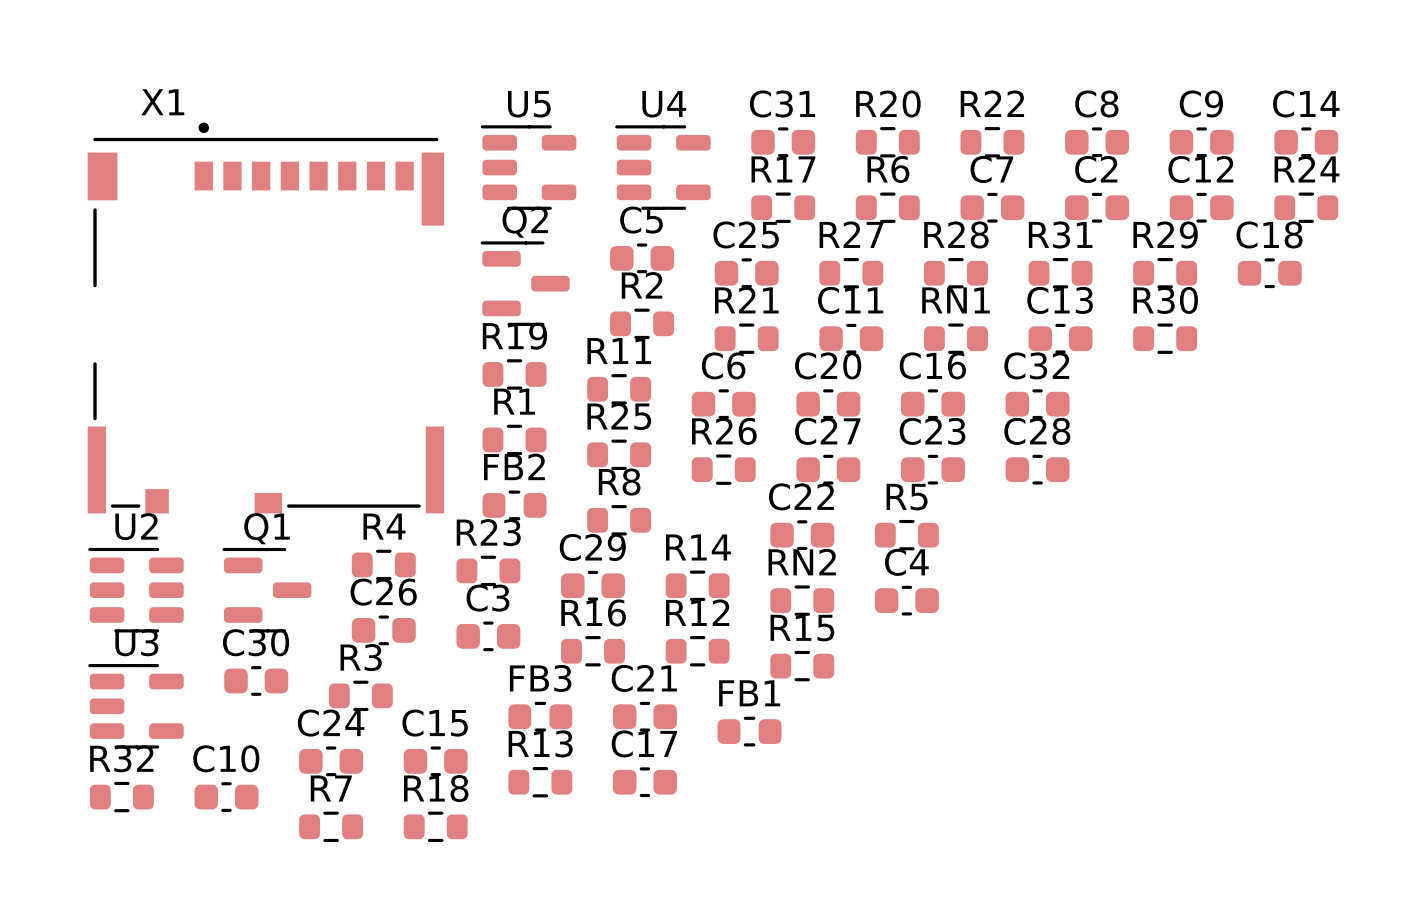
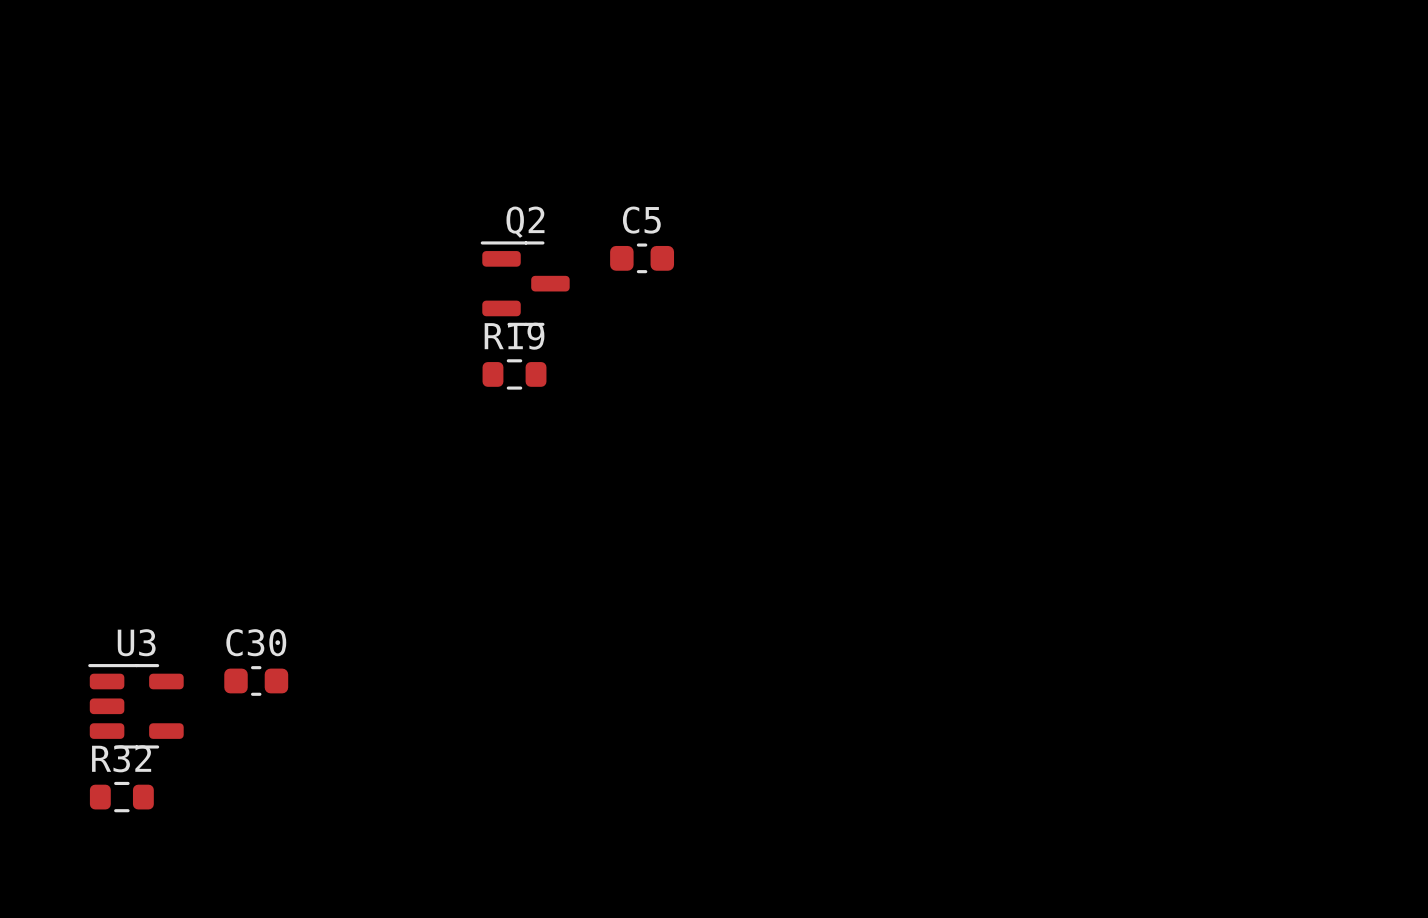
C31: (783, 142) -> none
R20: (887, 142) -> none
R22: (992, 142) -> none
C8: (1097, 142) -> none
C9: (1201, 142) -> none
C14: (1306, 142) -> none
U5: (528, 167) -> none
U4: (662, 167) -> none
R17: (783, 207) -> none
R6: (887, 207) -> none
C7: (992, 207) -> none
C2: (1097, 207) -> none
C12: (1201, 207) -> none
R24: (1306, 207) -> none
C25: (746, 273) -> none
R27: (851, 273) -> none
R28: (955, 273) -> none
R31: (1060, 273) -> none
R29: (1165, 273) -> none
C18: (1269, 273) -> none
X1: (265, 317) -> none
R2: (642, 323) -> none
R21: (746, 338) -> none
C11: (851, 338) -> none
RN1: (955, 338) -> none
C13: (1060, 338) -> none
R30: (1165, 338) -> none
R11: (619, 389) -> none
C6: (723, 404) -> none
C20: (828, 404) -> none
C16: (932, 404) -> none
C32: (1037, 404) -> none
R1: (514, 439) -> none
R25: (619, 454) -> none
R26: (723, 469) -> none
C27: (828, 469) -> none
C23: (932, 469) -> none
C28: (1037, 469) -> none
FB2: (514, 505) -> none
R8: (619, 520) -> none
C22: (802, 535) -> none
R5: (906, 535) -> none
R4: (383, 564) -> none
R23: (488, 570) -> none
C29: (593, 585) -> none
R14: (697, 585) -> none
U2: (135, 590) -> none
Q1: (266, 590) -> none
RN2: (802, 600) -> none
C4: (906, 600) -> none
C26: (383, 630) -> none
C3: (488, 636) -> none
R16: (593, 651) -> none
R12: (697, 651) -> none
R15: (802, 666) -> none
R3: (360, 695) -> none
FB3: (540, 716) -> none
C21: (644, 716) -> none
FB1: (749, 731) -> none
C24: (331, 761) -> none
C15: (435, 761) -> none
R13: (540, 782) -> none
C17: (644, 782) -> none
C10: (226, 797) -> none
R7: (331, 826) -> none
R18: (435, 826) -> none

